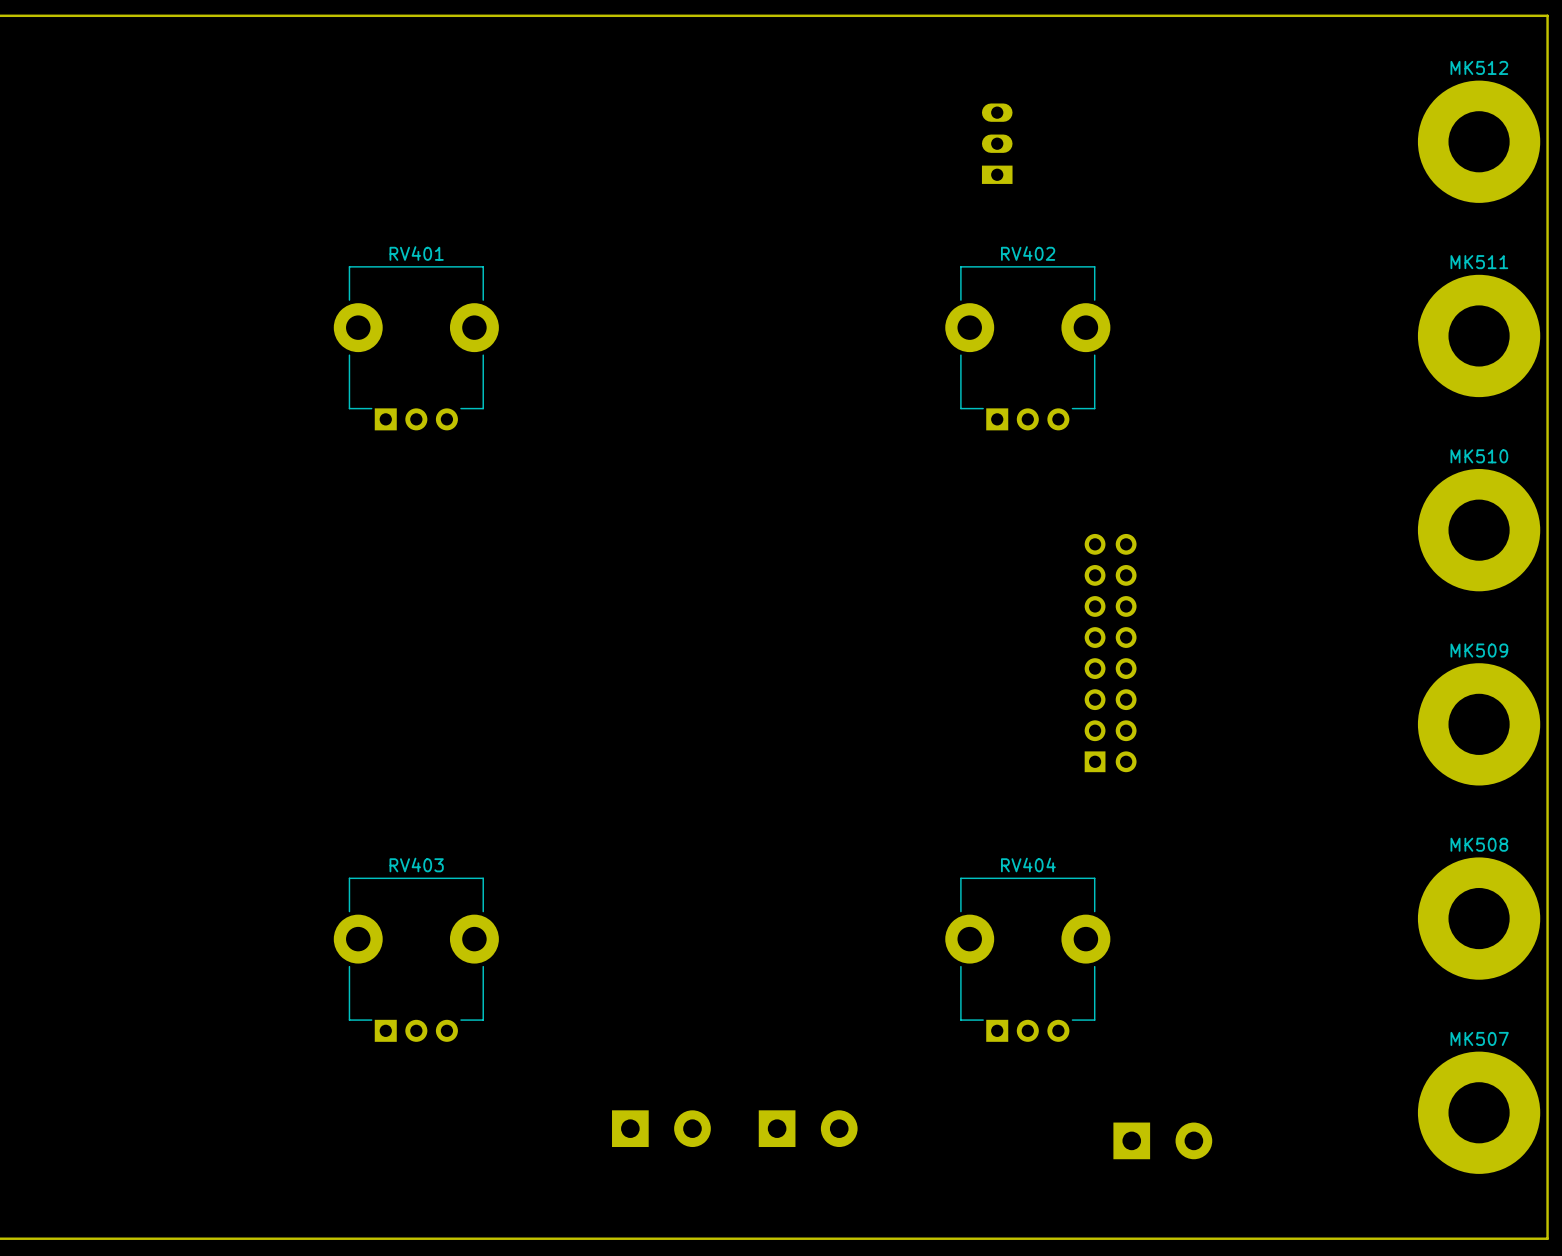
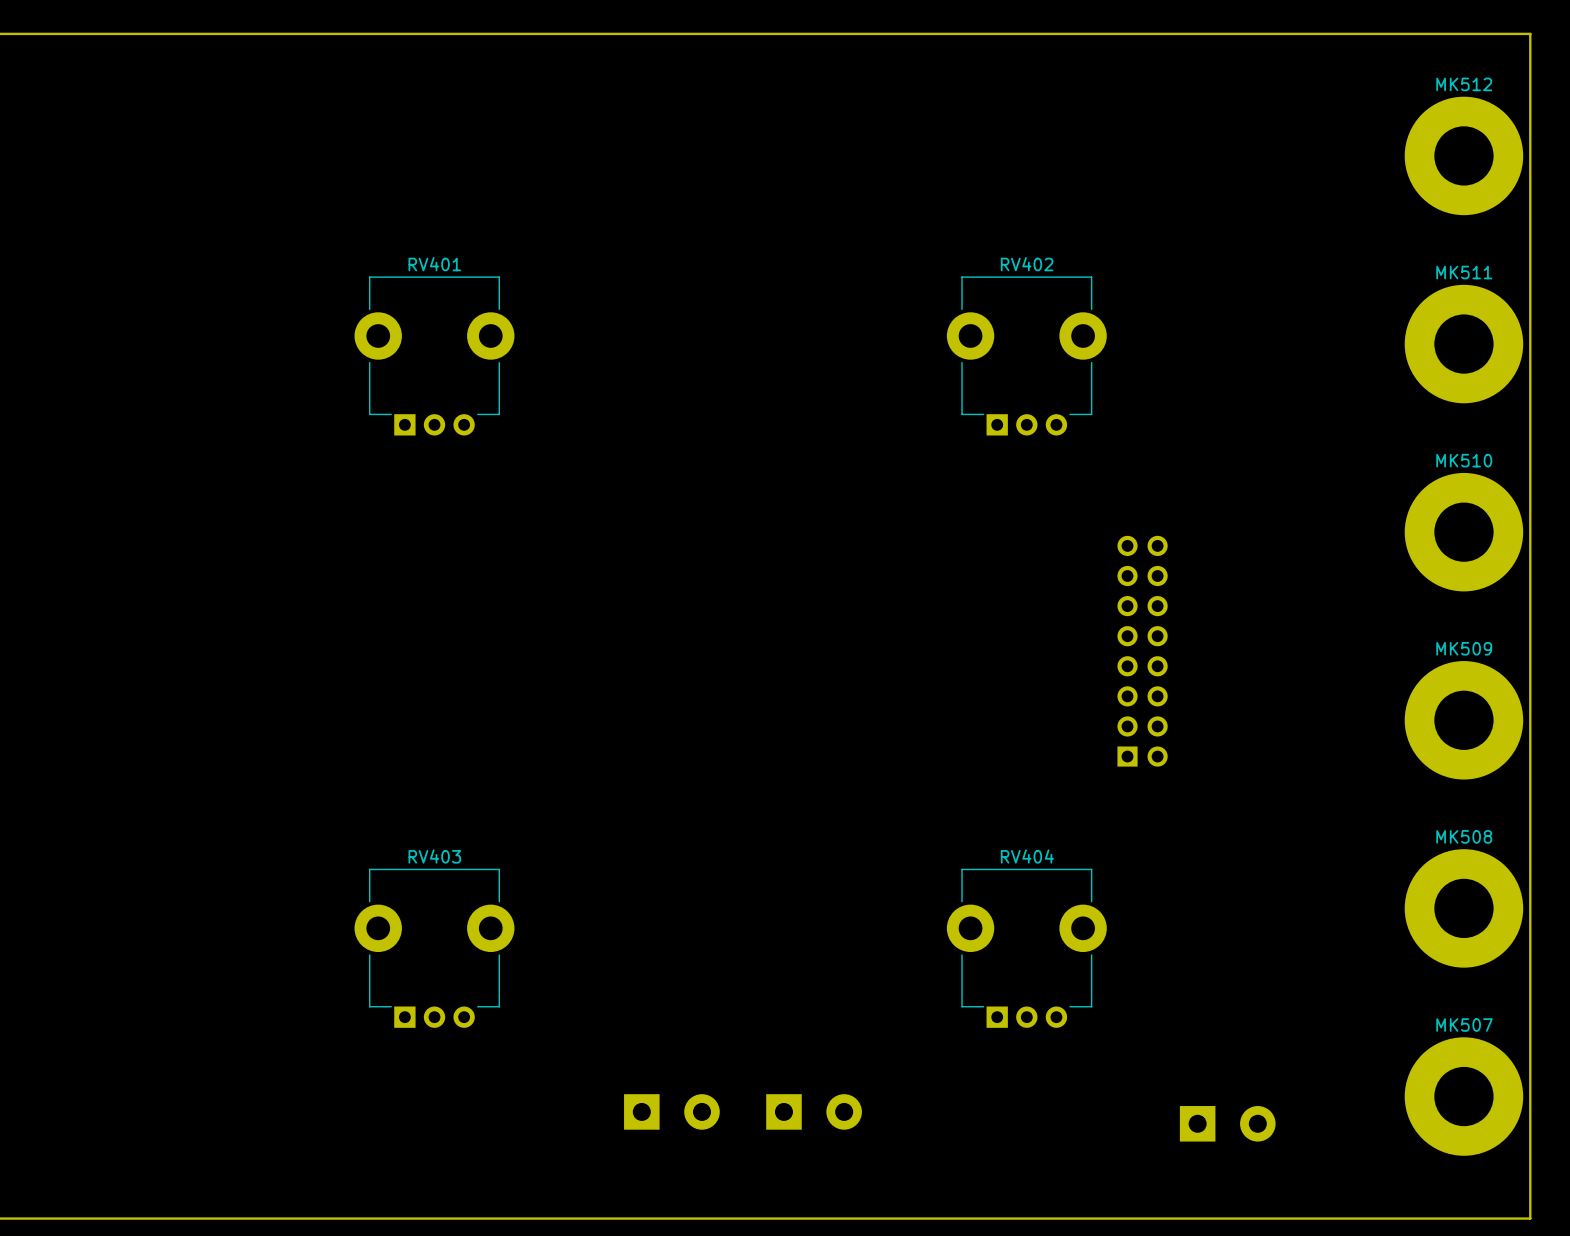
part: (997, 143) -> none
part position: (1110, 653) -> (1142, 651)
part position: (1162, 1140) -> (1227, 1123)

